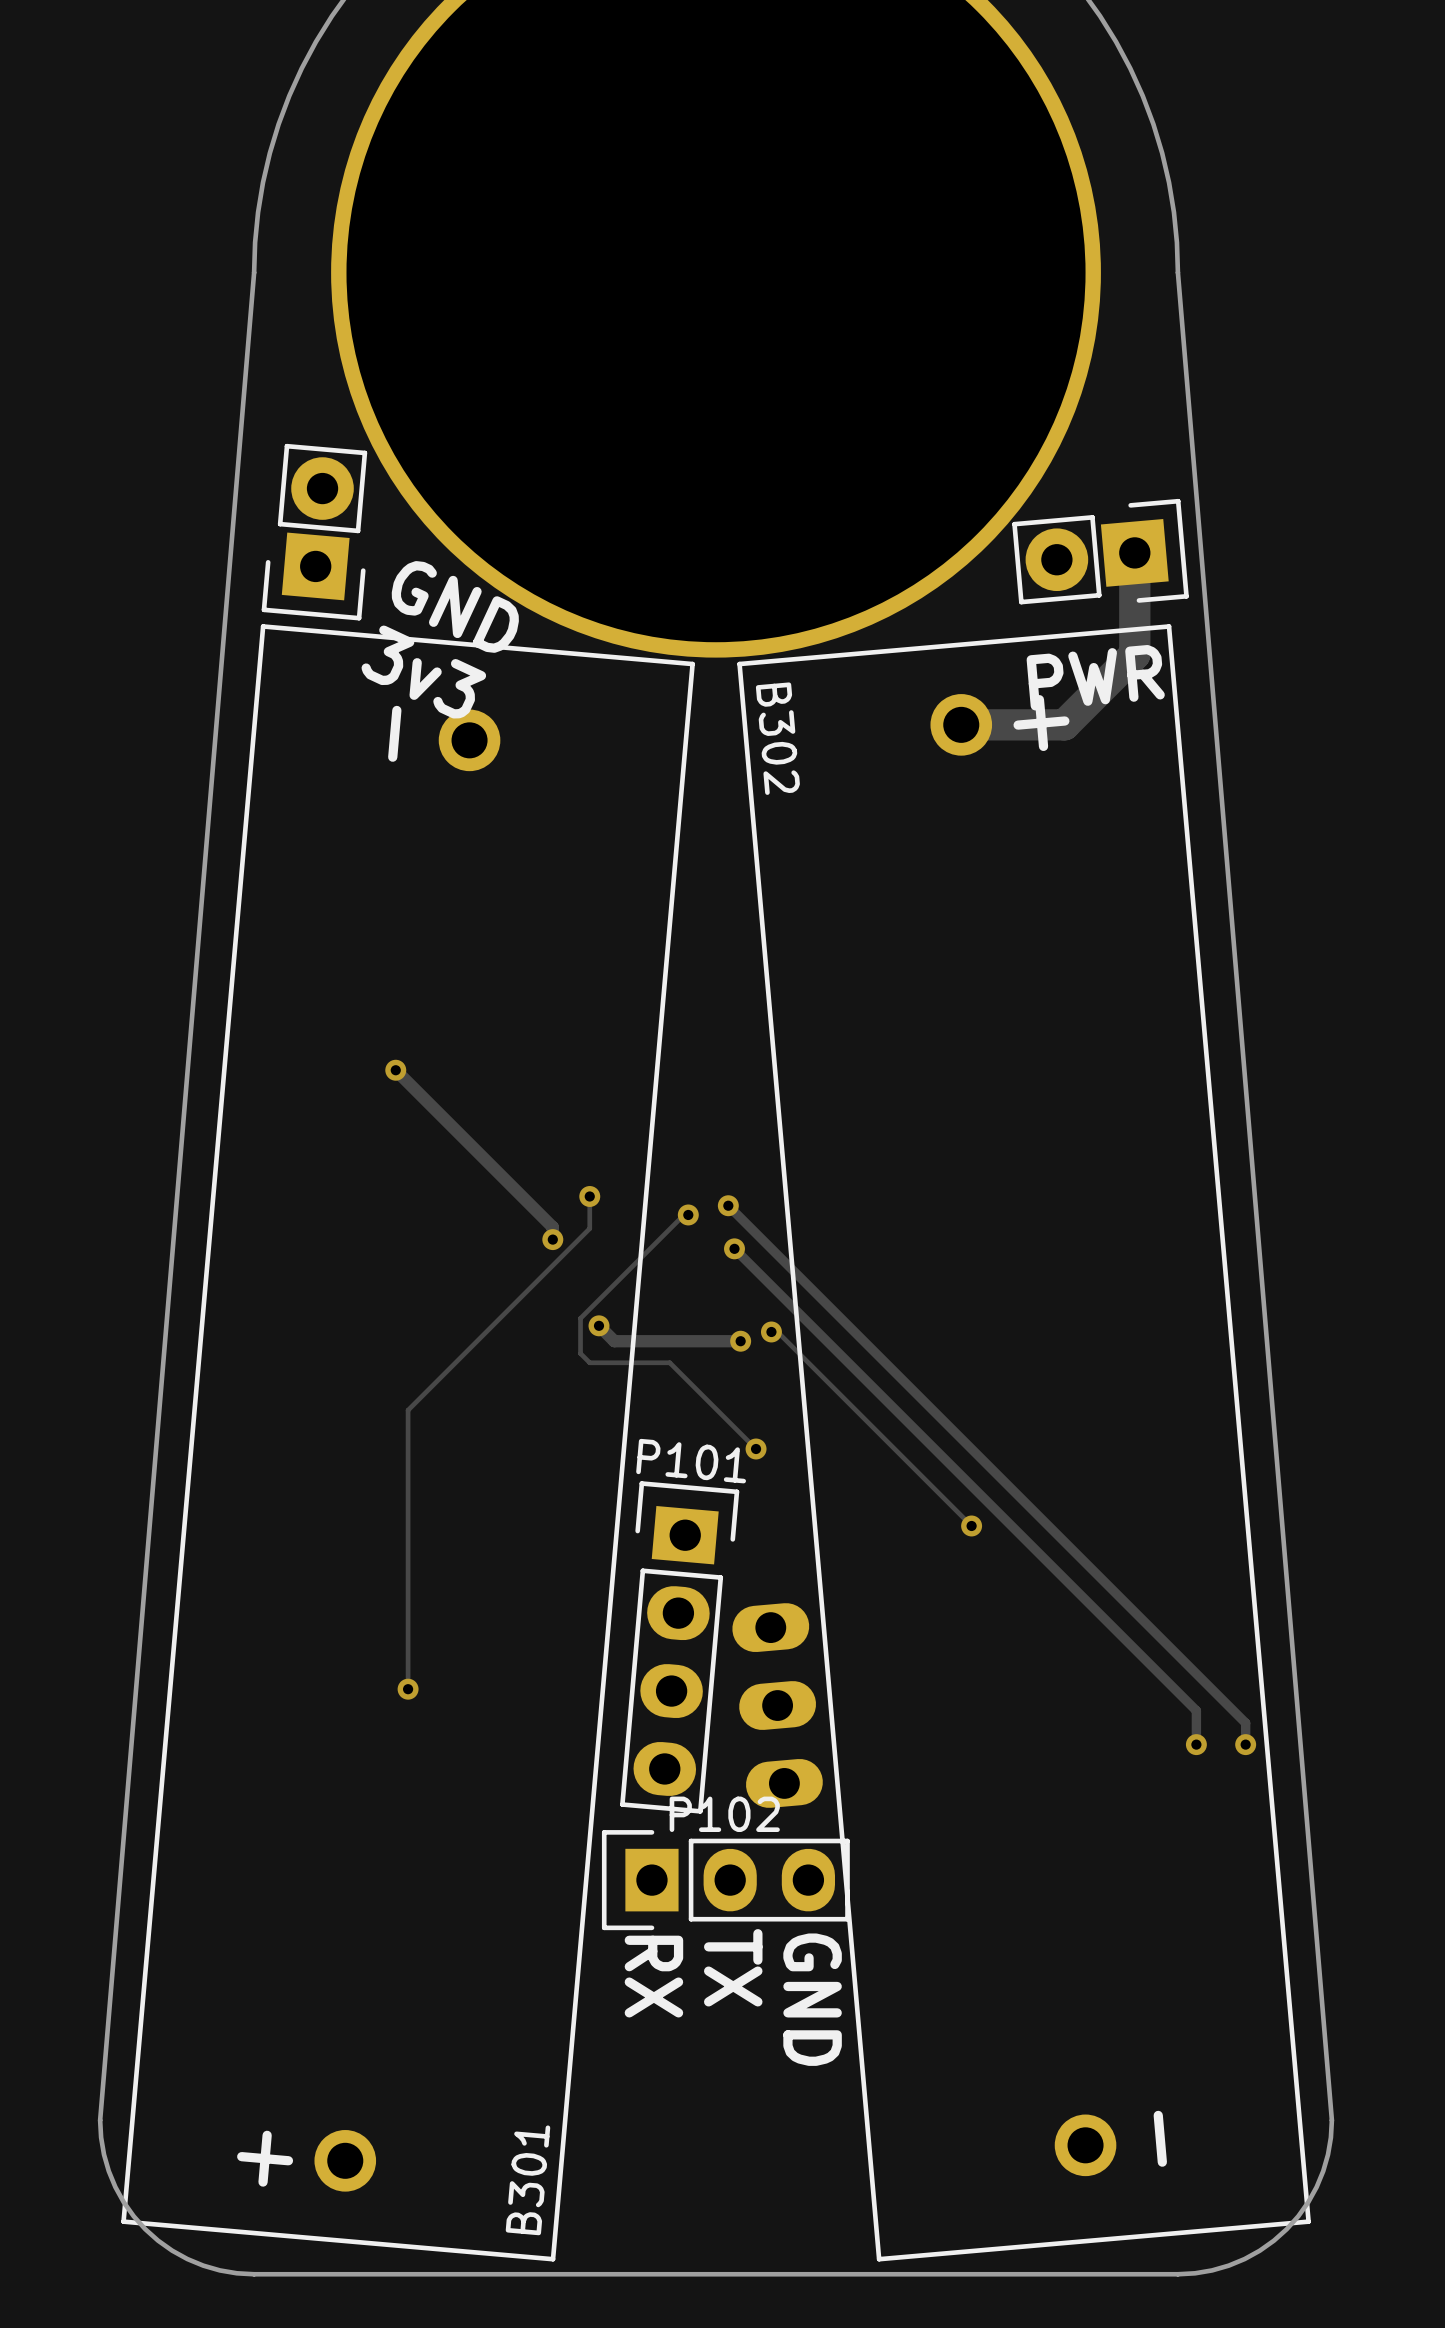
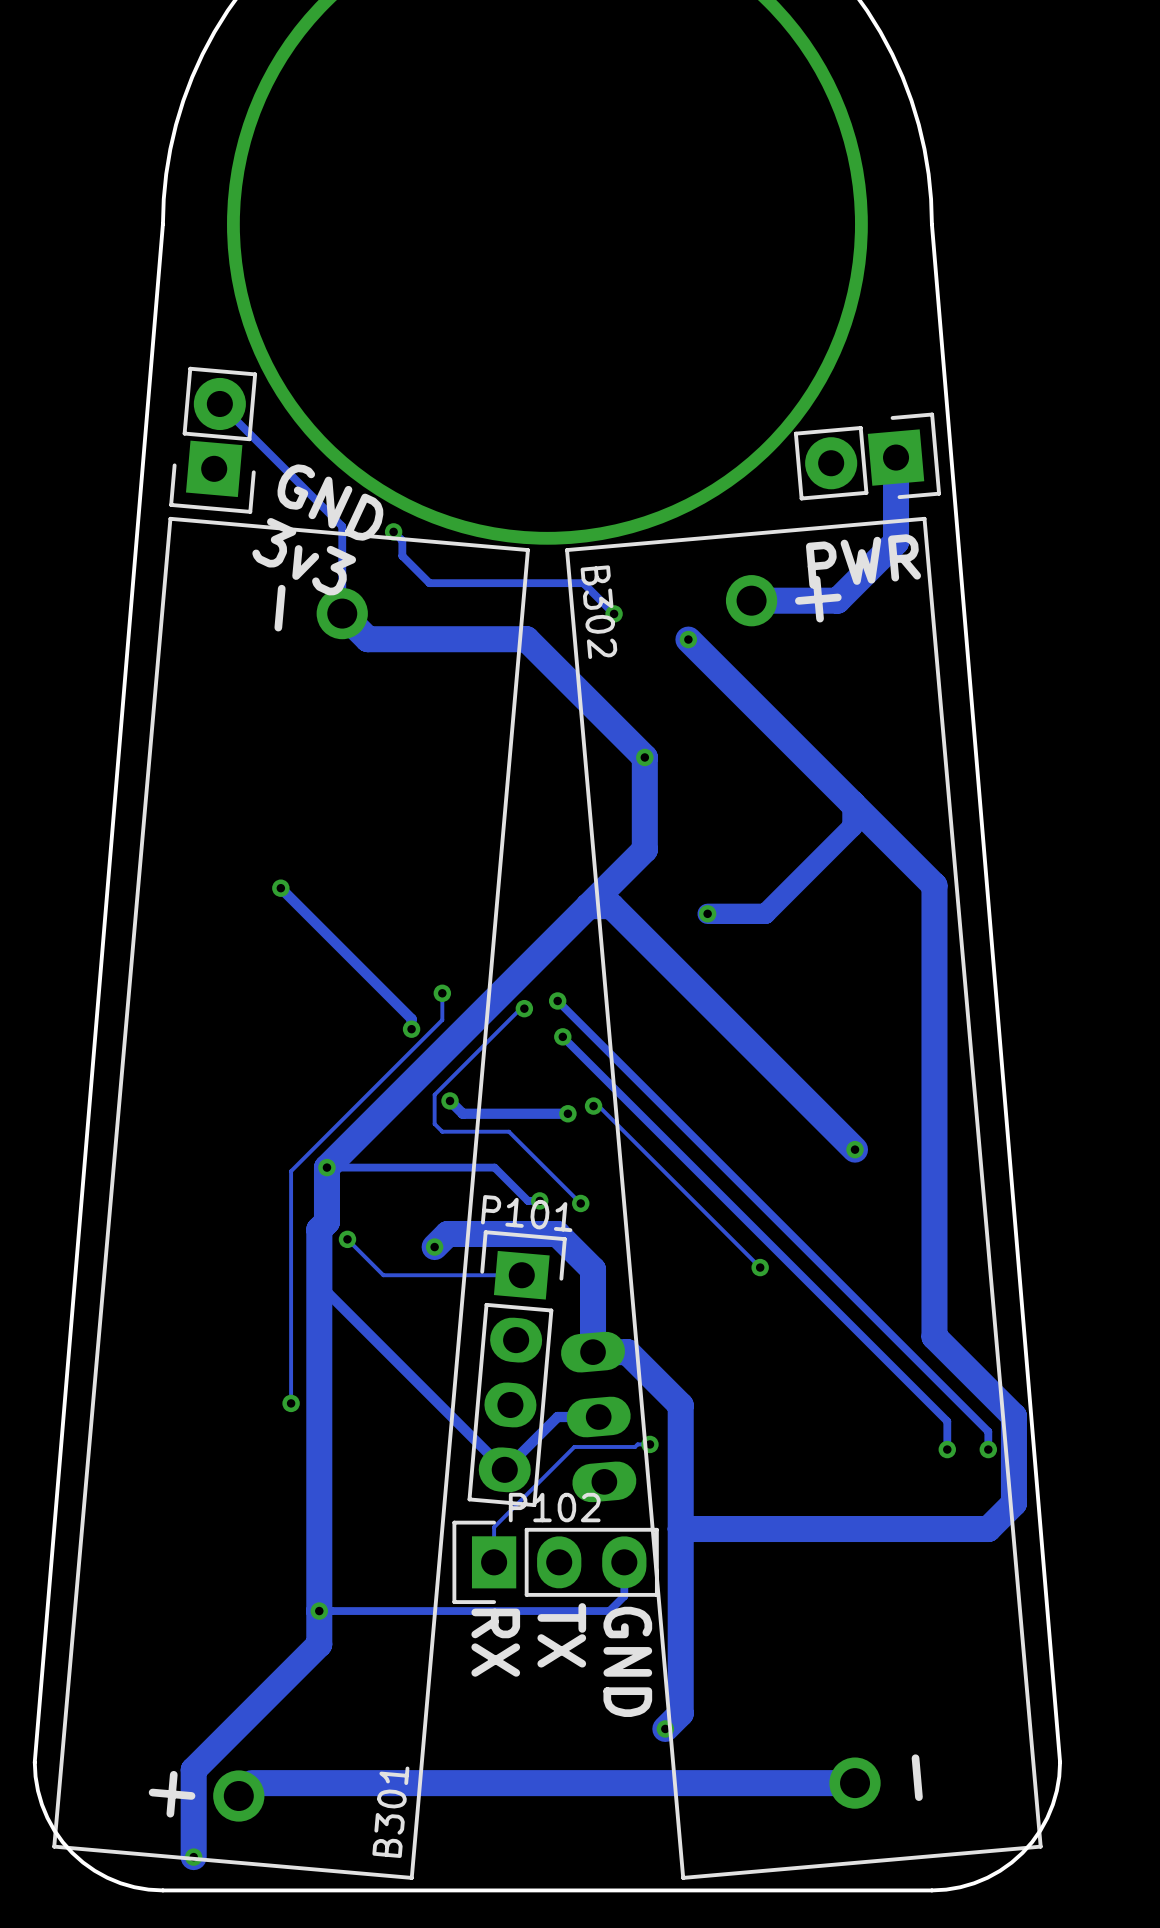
track: none -> (219, 403) (342, 526) (342, 613) (367, 639) (526, 639) (644, 757) (644, 849) (326, 1167)
track: none -> (393, 531) (402, 540) (402, 555) (429, 583) (583, 583) (614, 613)
via: none -> (393, 531)
via: none -> (614, 613)
track: none -> (688, 639) (934, 885) (934, 1336) (1013, 1416) (1013, 1503) (988, 1529) (680, 1529)
via: none -> (688, 639)
via: none -> (644, 757)
track: none -> (852, 803) (852, 826) (765, 913) (707, 913)
track: none -> (588, 906) (611, 906) (855, 1149)
via: none -> (707, 913)
via: none -> (855, 1149)
track: none -> (326, 1167) (494, 1167) (527, 1200) (539, 1200)
track: none -> (326, 1167) (326, 1221) (319, 1229) (319, 1644) (193, 1769) (193, 1857)
track: none -> (326, 1167) (326, 1292) (504, 1469) (557, 1417) (598, 1417)
via: none -> (326, 1167)
via: none -> (539, 1200)
track: none -> (347, 1239) (383, 1275) (521, 1275)
via: none -> (347, 1239)
track: none -> (434, 1247) (447, 1234) (557, 1234) (593, 1269) (593, 1352) (627, 1352) (680, 1405) (680, 1713) (665, 1728)
via: none -> (434, 1247)
track: none -> (649, 1444) (637, 1444) (635, 1446) (574, 1446) (494, 1527) (494, 1557)
via: none -> (649, 1444)
track: none -> (624, 1562) (624, 1596) (609, 1611) (319, 1611)
via: none -> (319, 1611)
via: none -> (665, 1728)
track: none -> (855, 1783) (251, 1783)
via: none -> (193, 1857)

